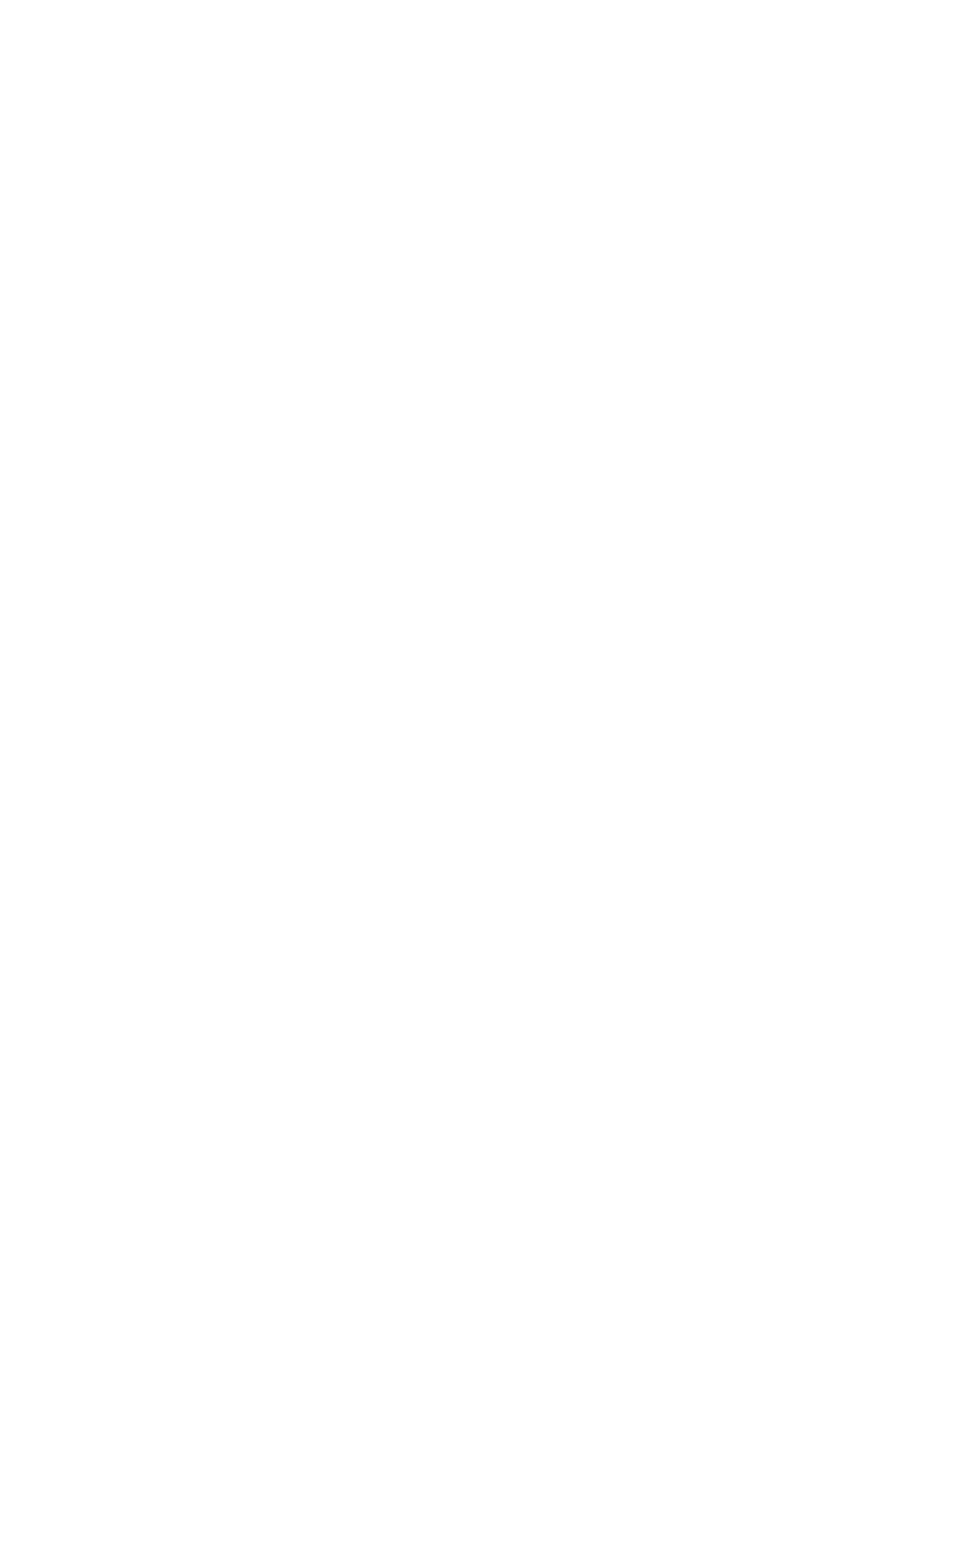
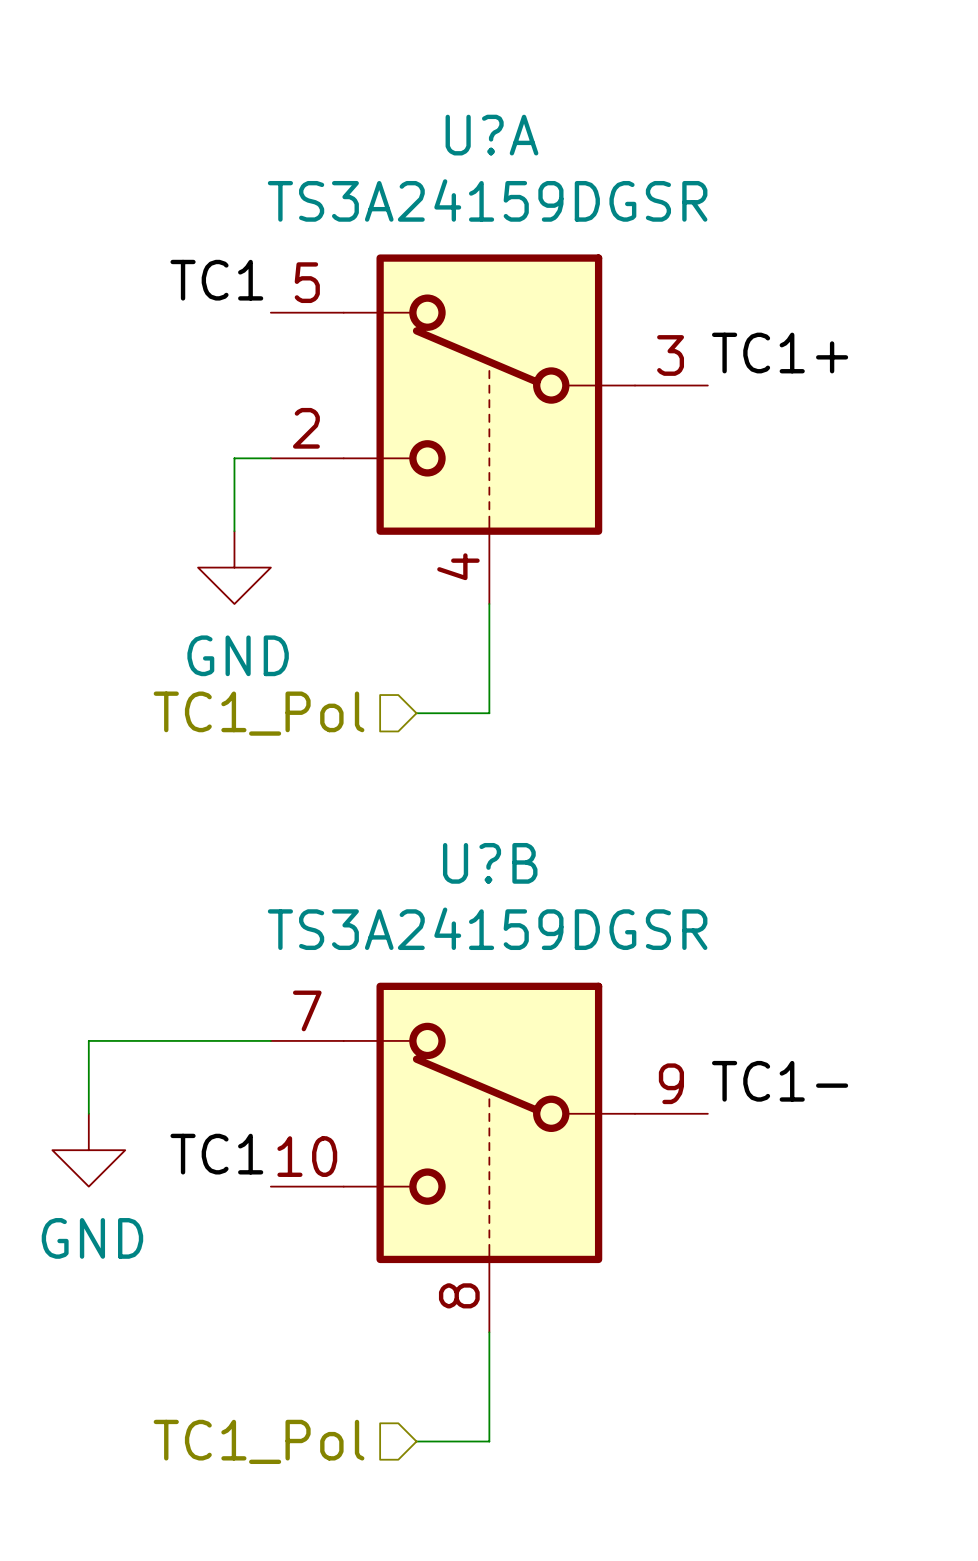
label: none -> TC1 (216, 280)
label: none -> TC1+ (780, 353)
U?A: none -> TS3A24159DGSR (489, 429)
wire: none -> (270, 458) (234, 458) (234, 531)
power symbol: none -> GND (234, 567)
wire: none -> (489, 604) (489, 713) (416, 713)
hierarchical label: none -> TC1_Pol (259, 713)
wire: none -> (270, 1040) (88, 1040) (88, 1113)
label: none -> TC1- (780, 1081)
power symbol: none -> GND (88, 1150)
label: none -> TC1 (216, 1154)
U?B: none -> TS3A24159DGSR (489, 1157)
wire: none -> (489, 1332) (489, 1441) (416, 1441)
hierarchical label: none -> TC1_Pol (259, 1441)

